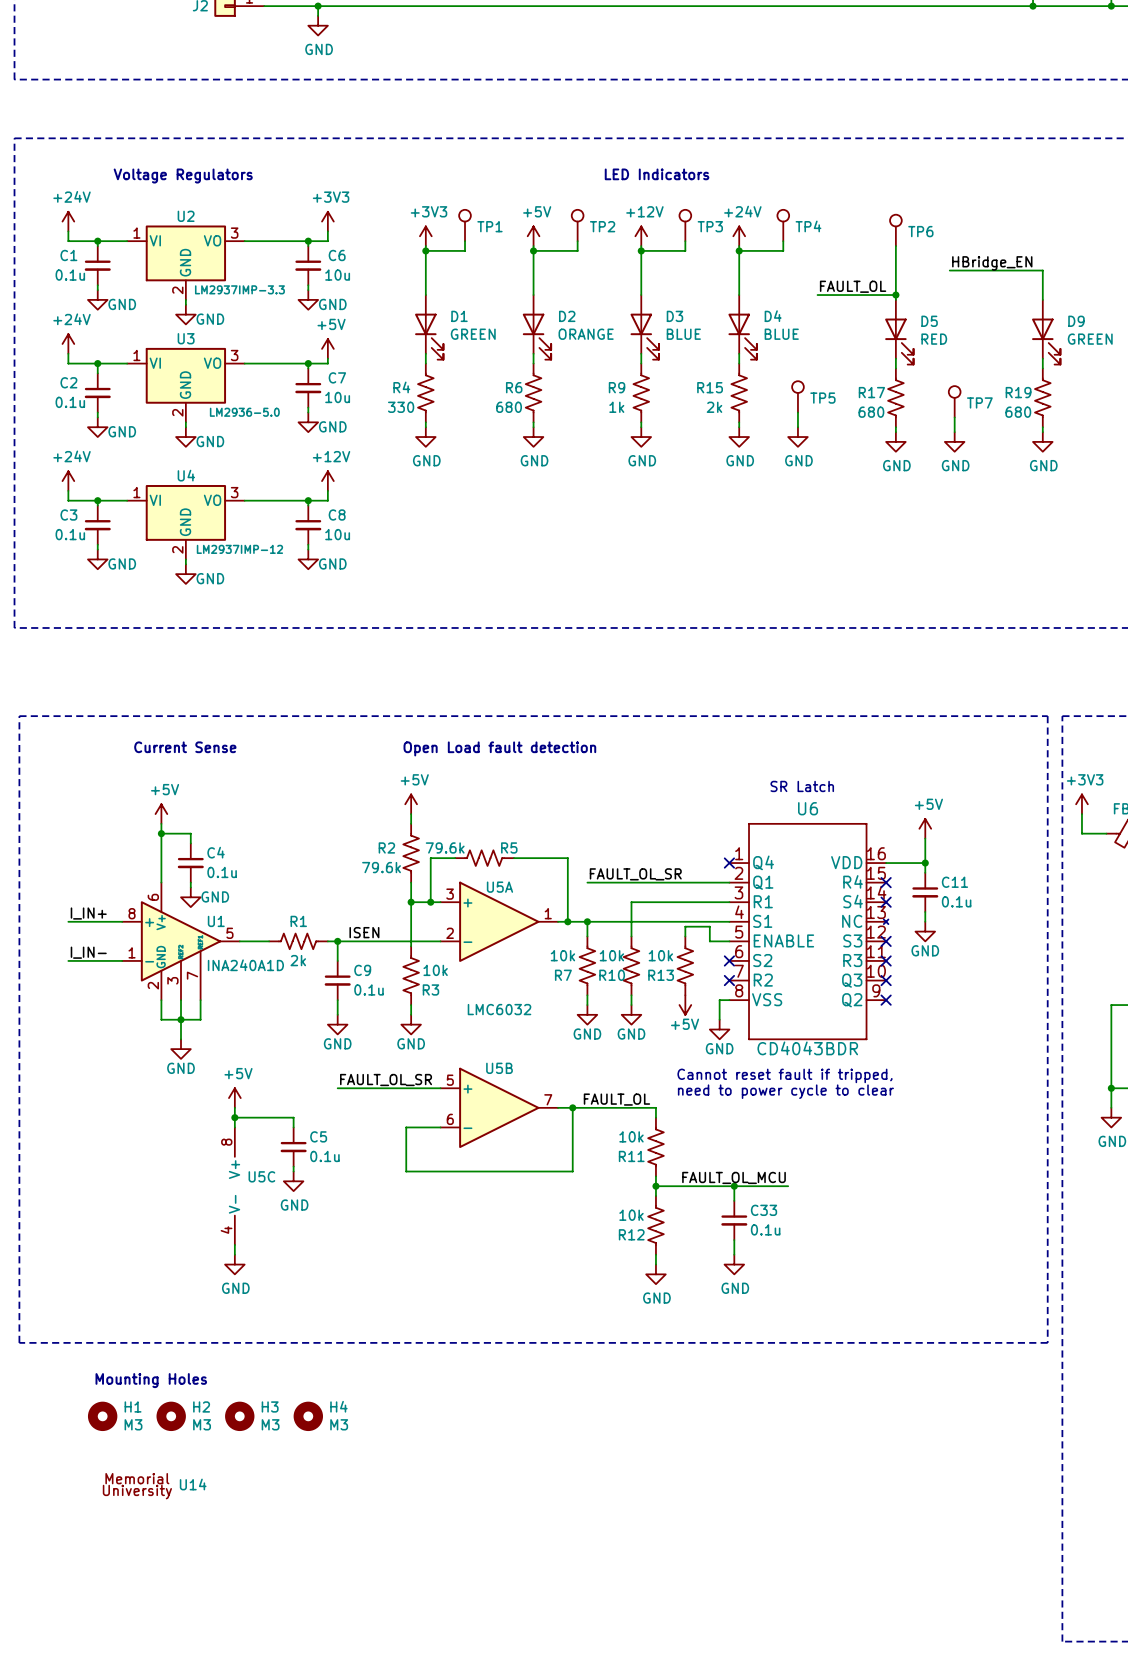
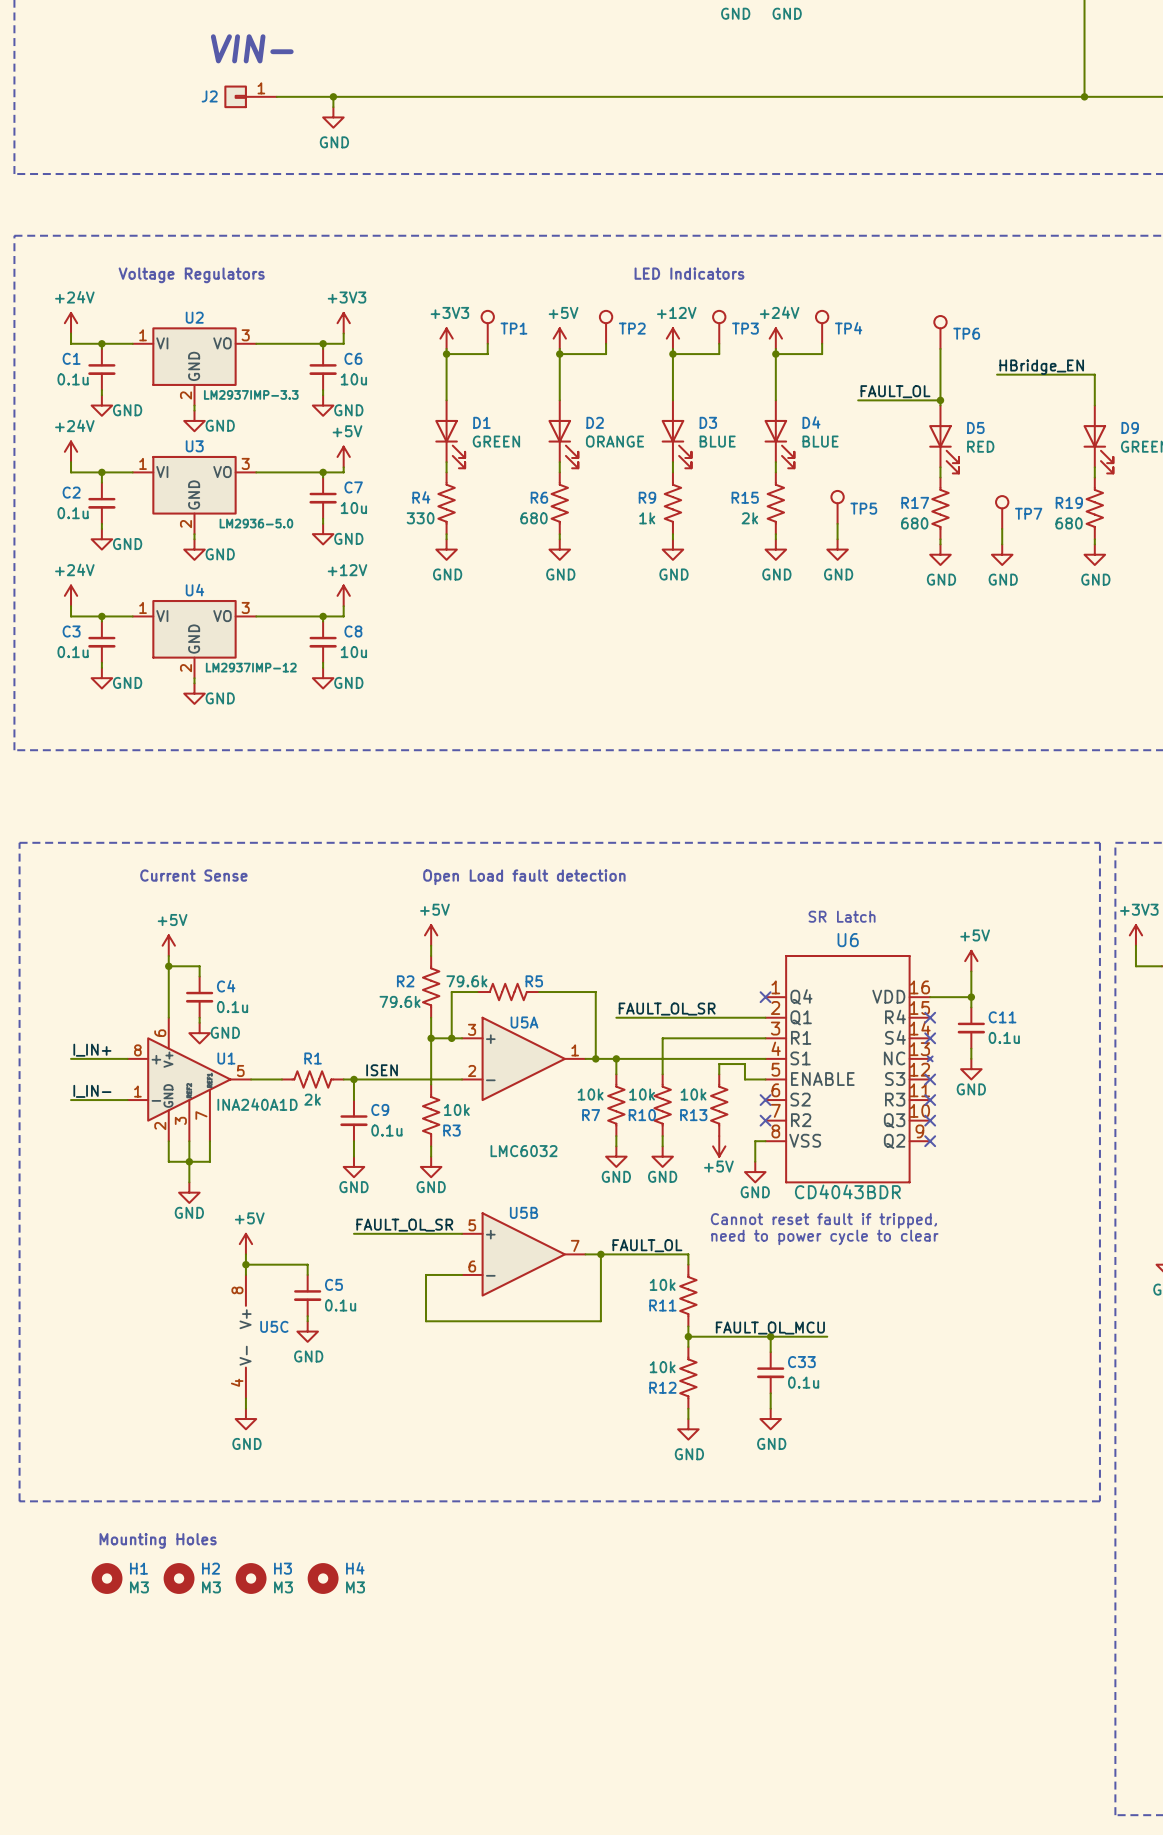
U14: (154, 1486) -> none

